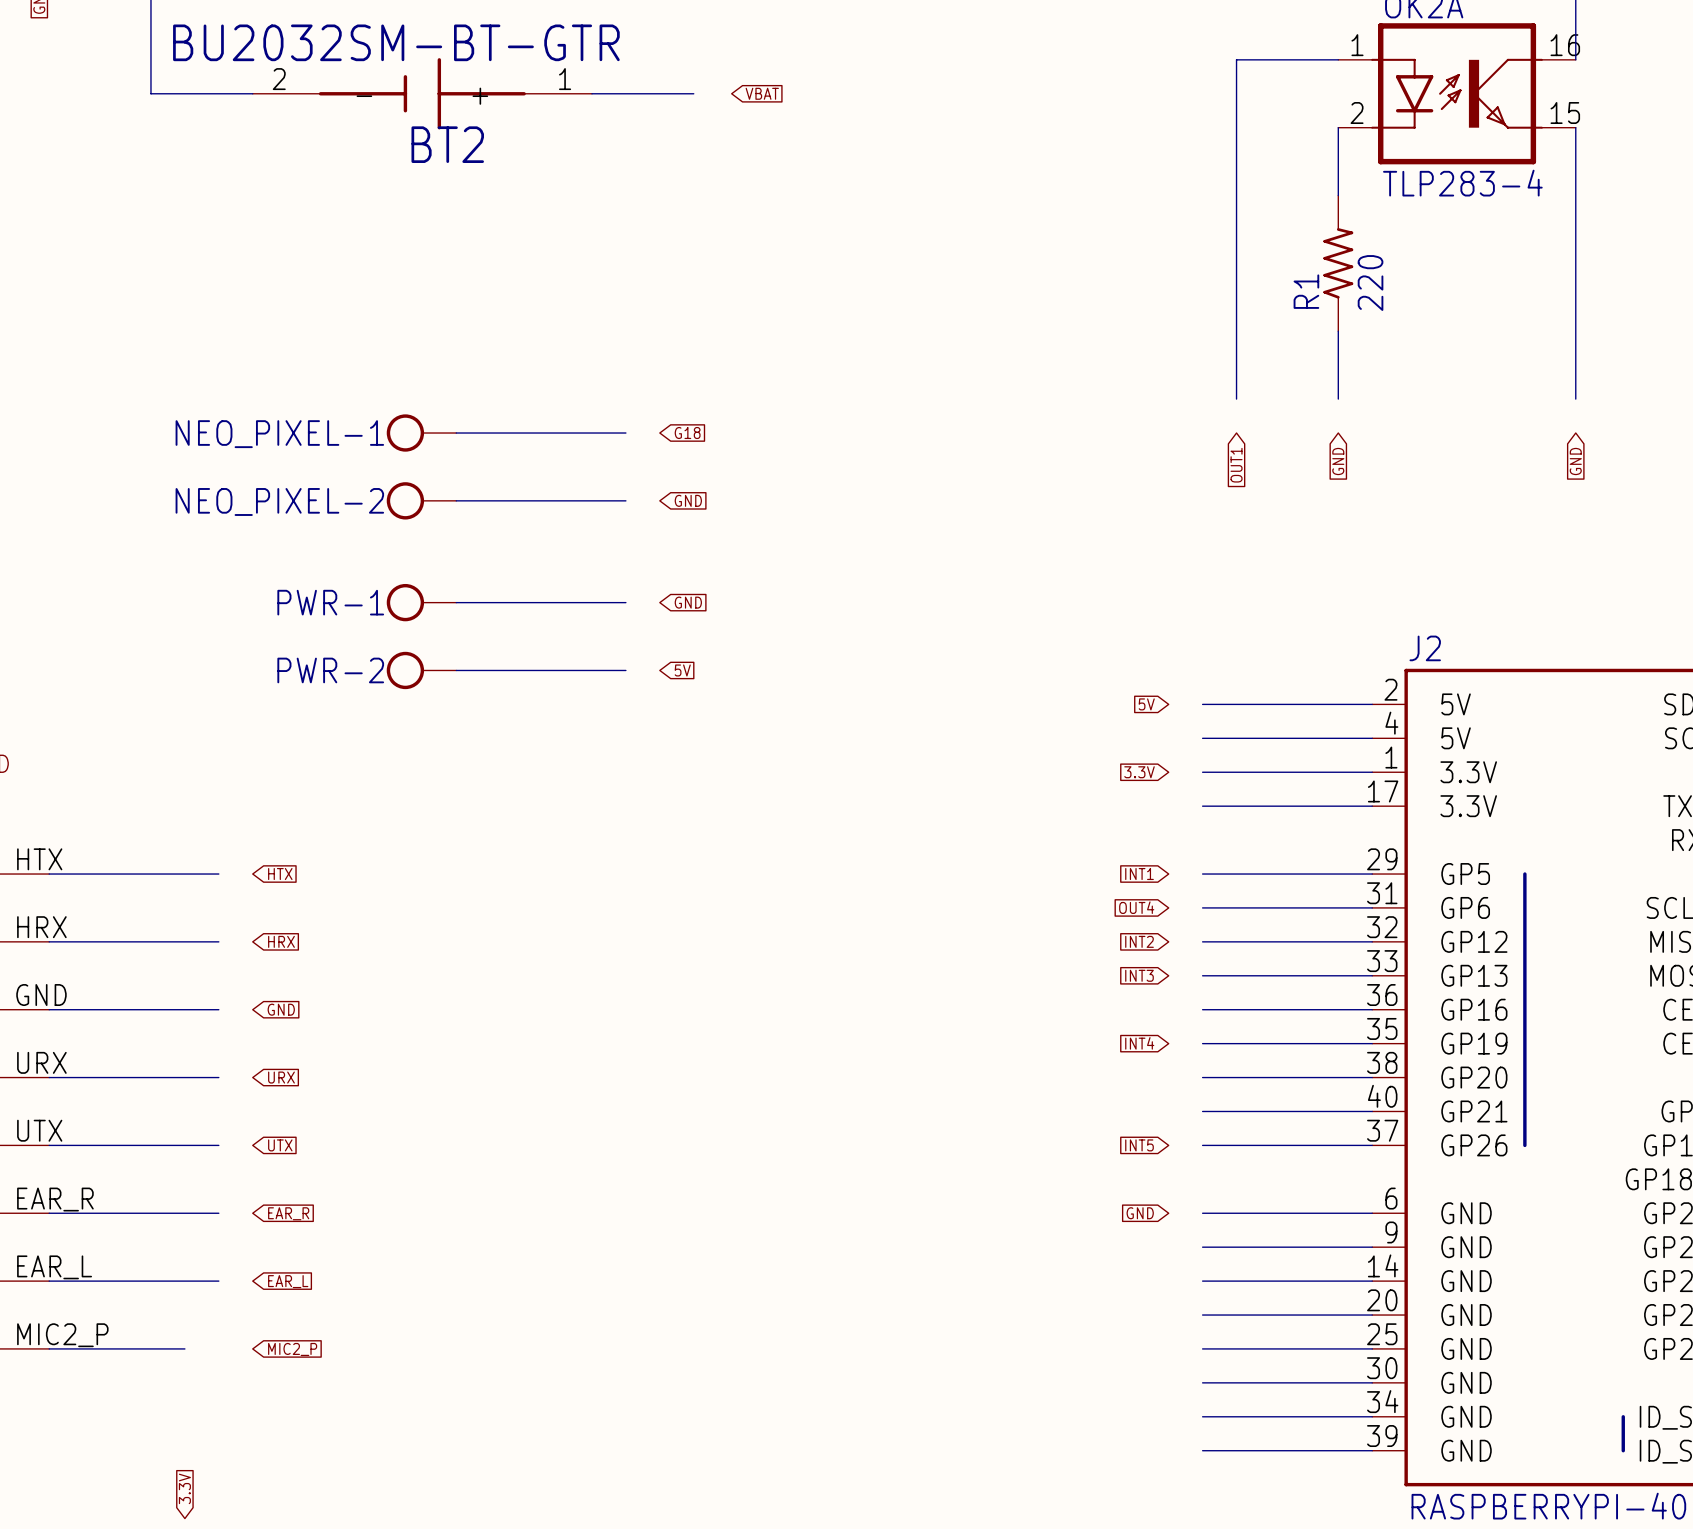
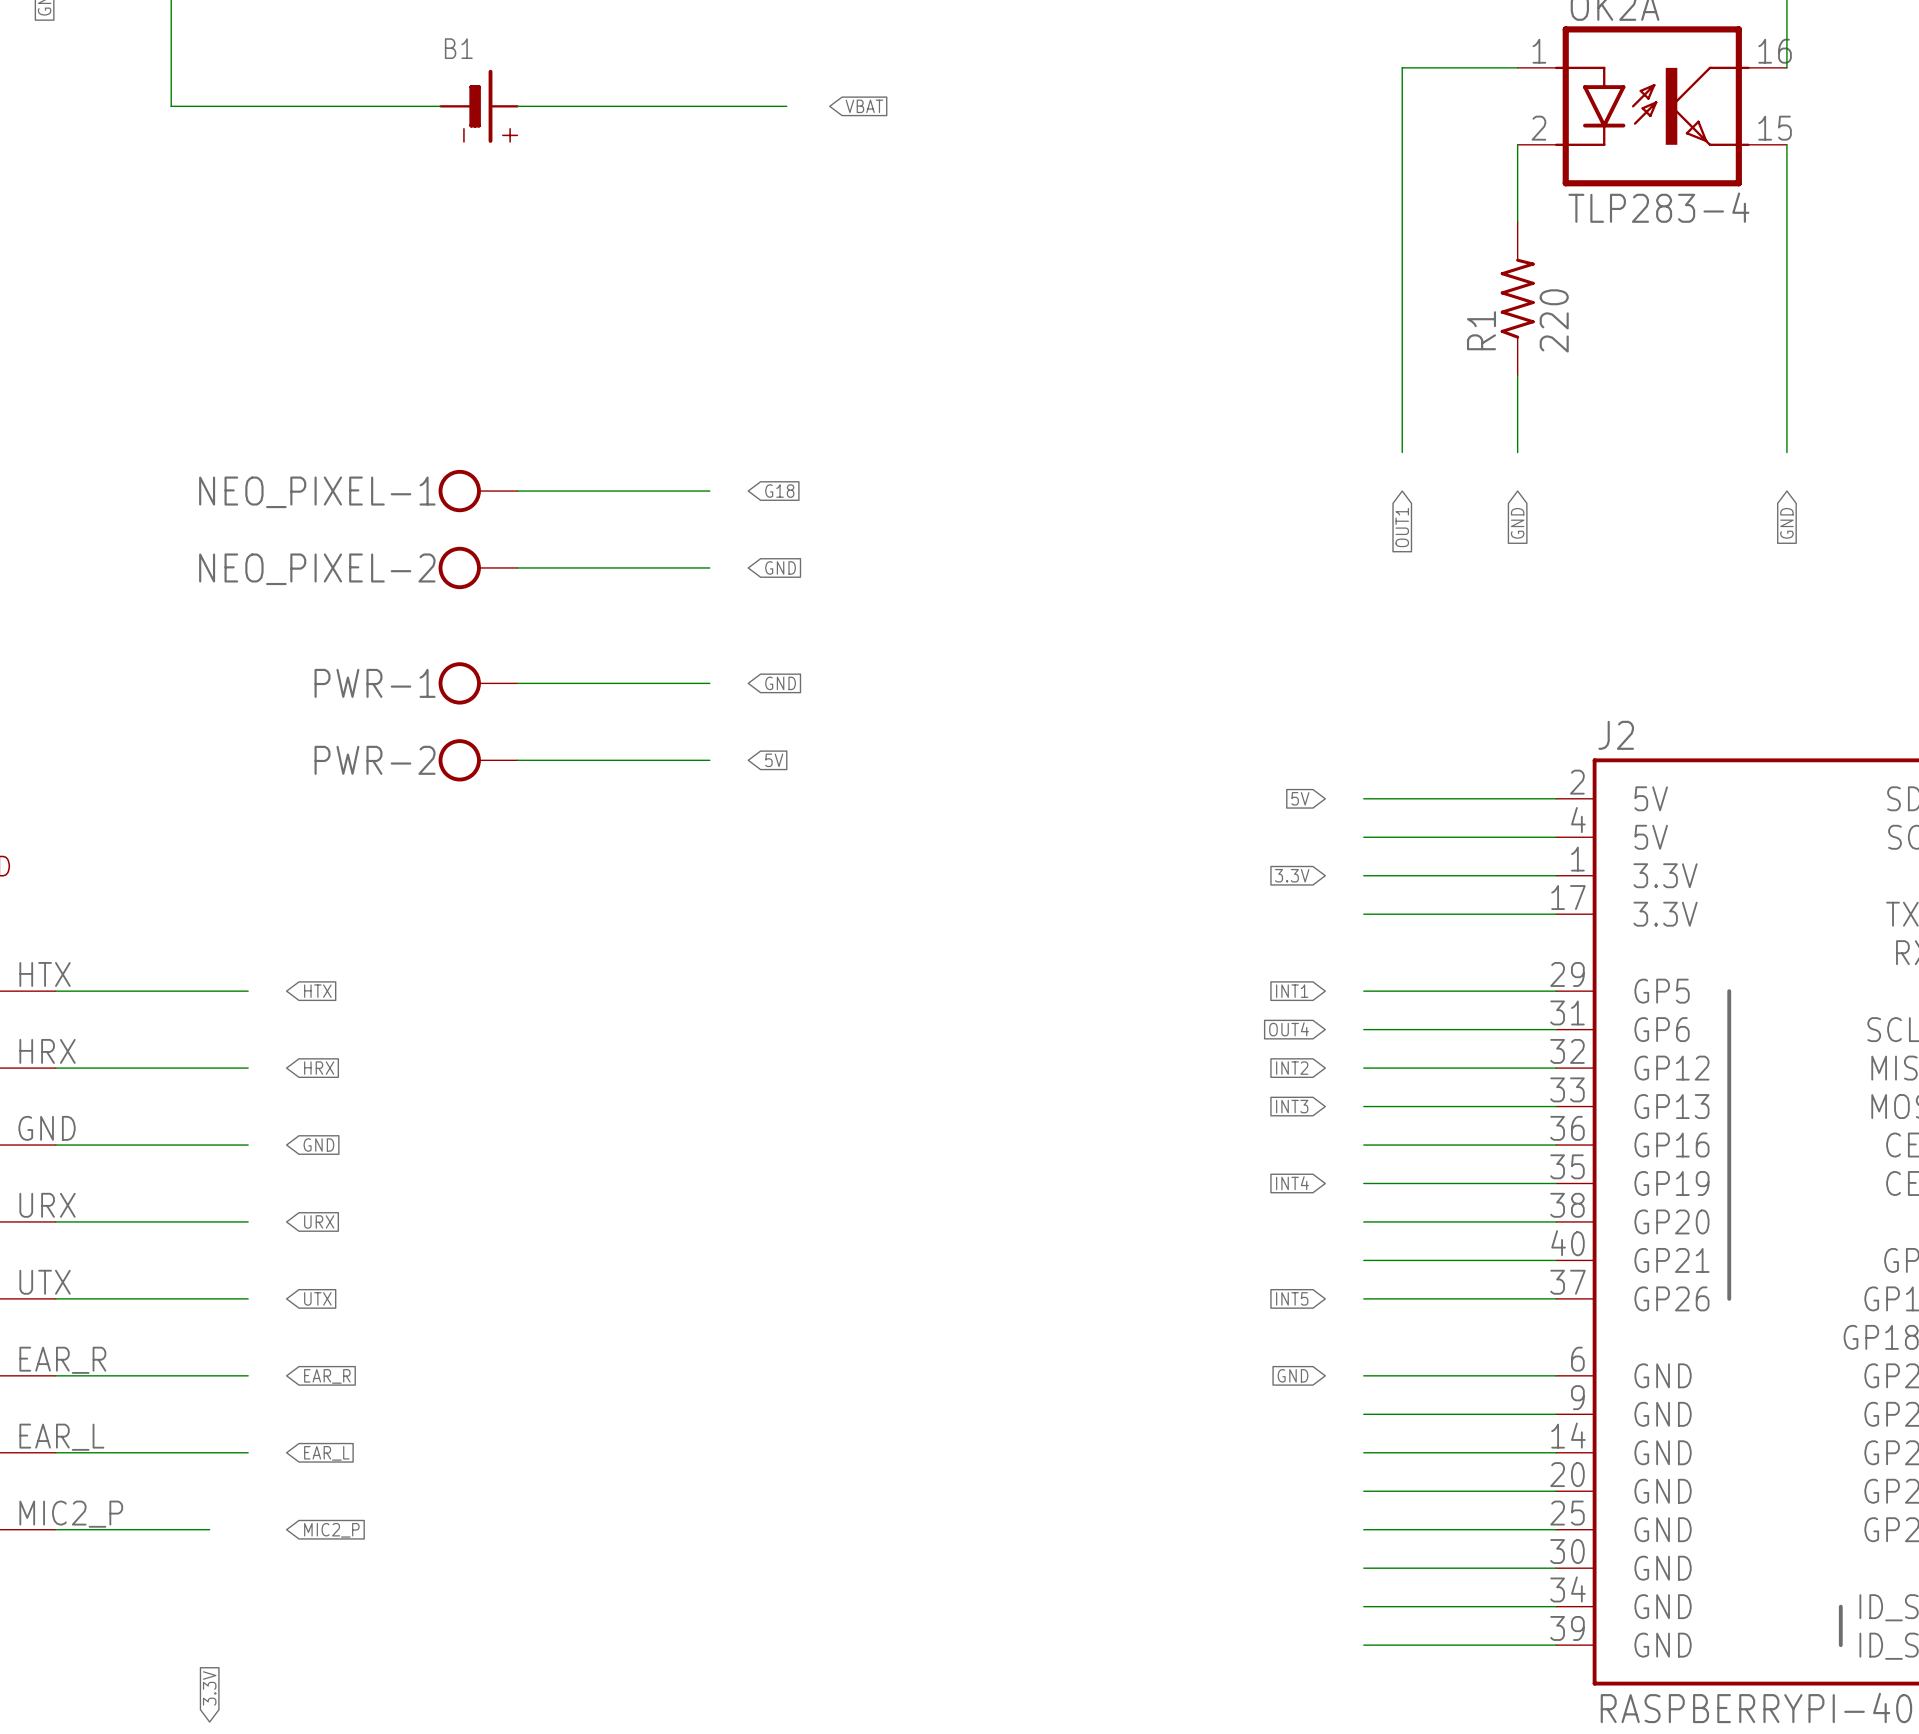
BT2: BU2032SM-BT-GTR (422, 93) -> none
B1: none -> (478, 106)

